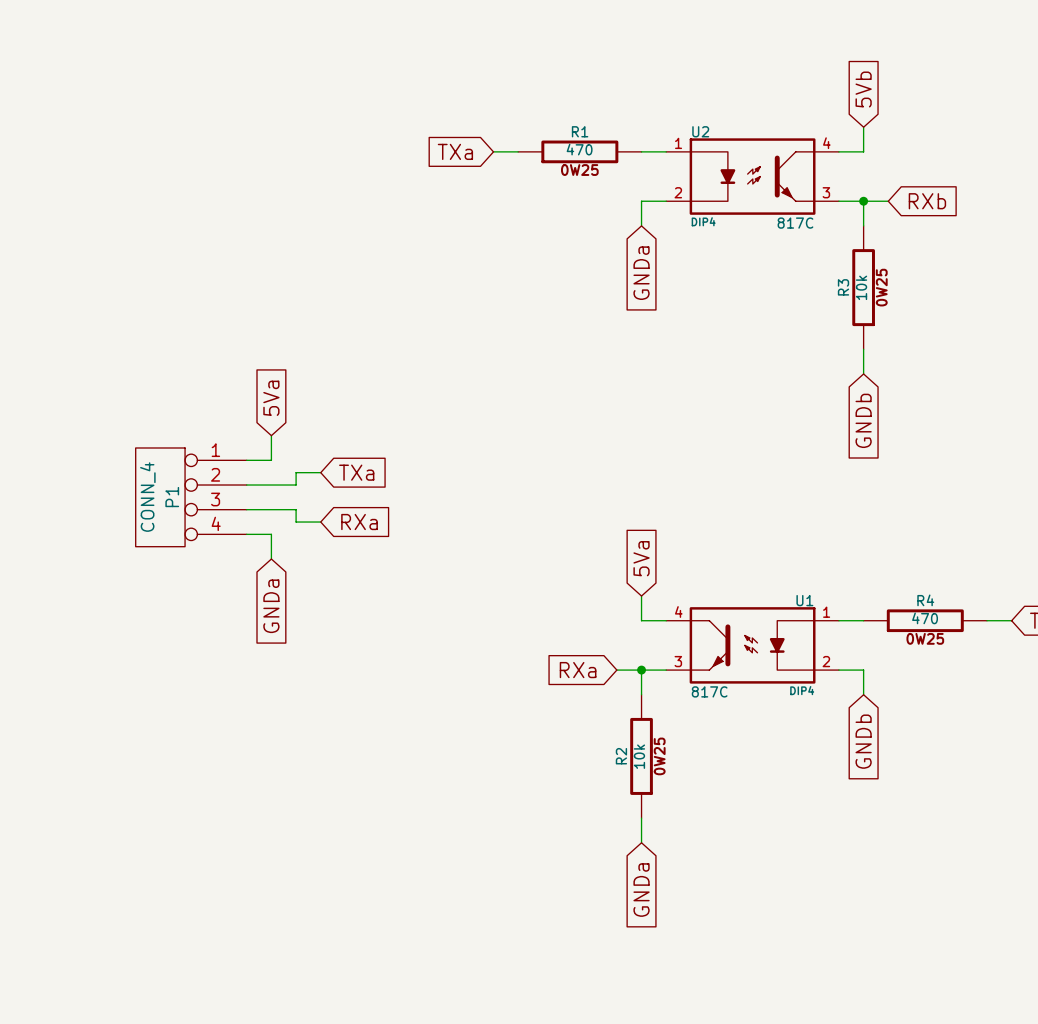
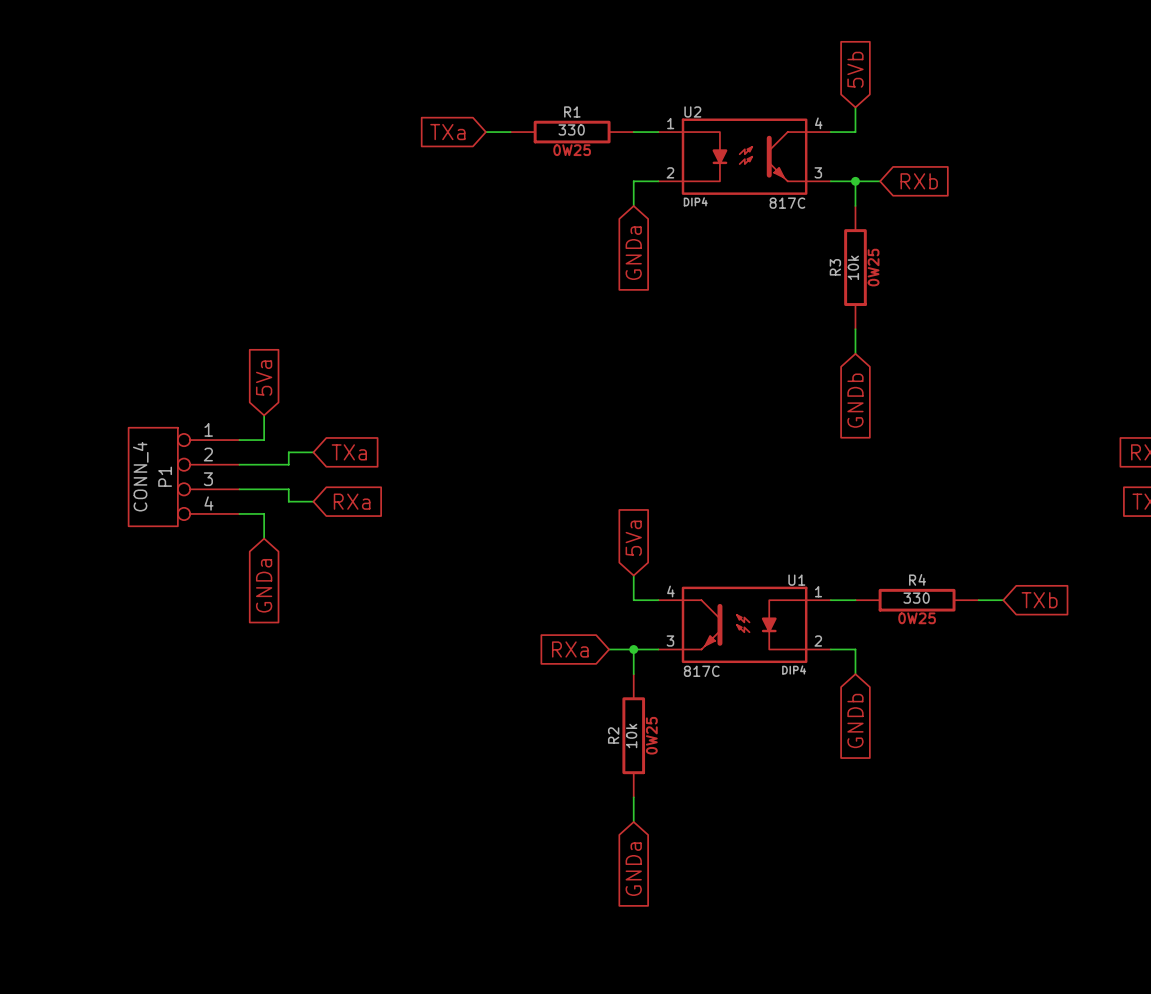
R1 value: 470 (579, 149) -> 330 (571, 129)
R4 value: 470 (925, 618) -> 330 (916, 598)

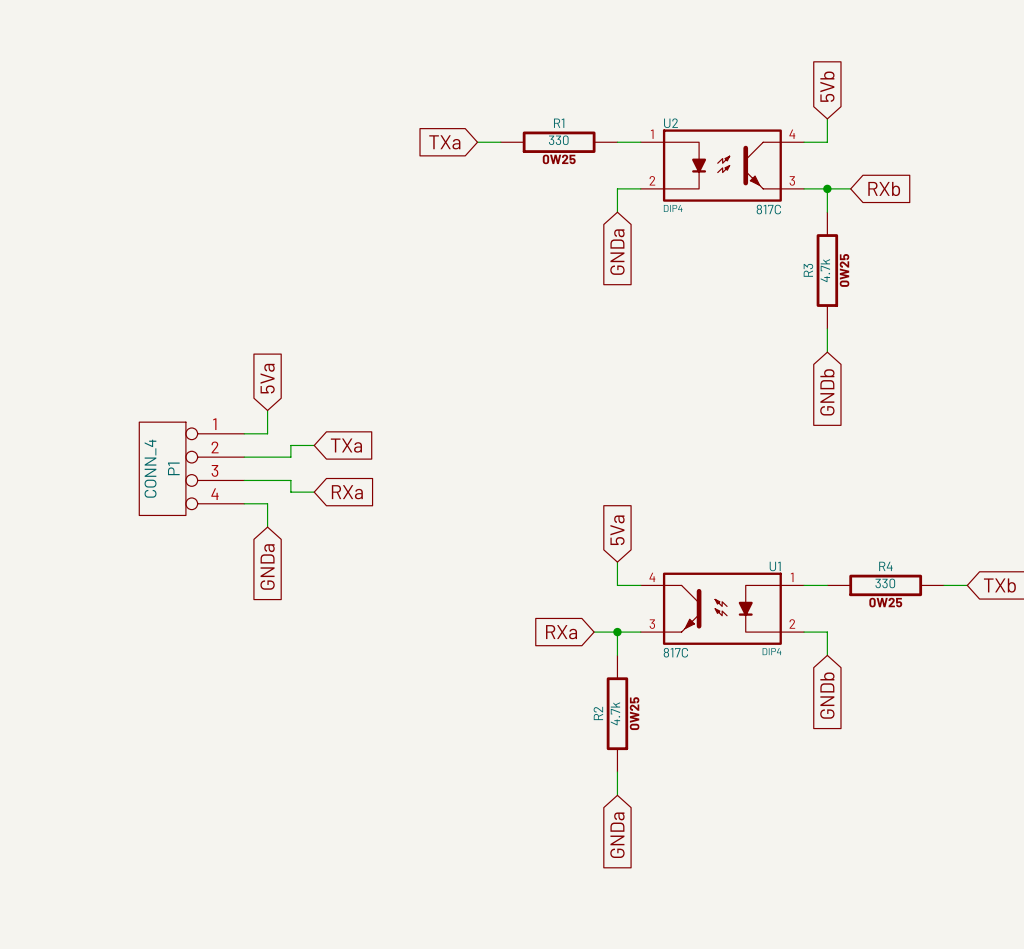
R3 value: 10k (853, 267) -> 4.7k (825, 270)
R2 value: 10k (631, 735) -> 4.7k (615, 713)

